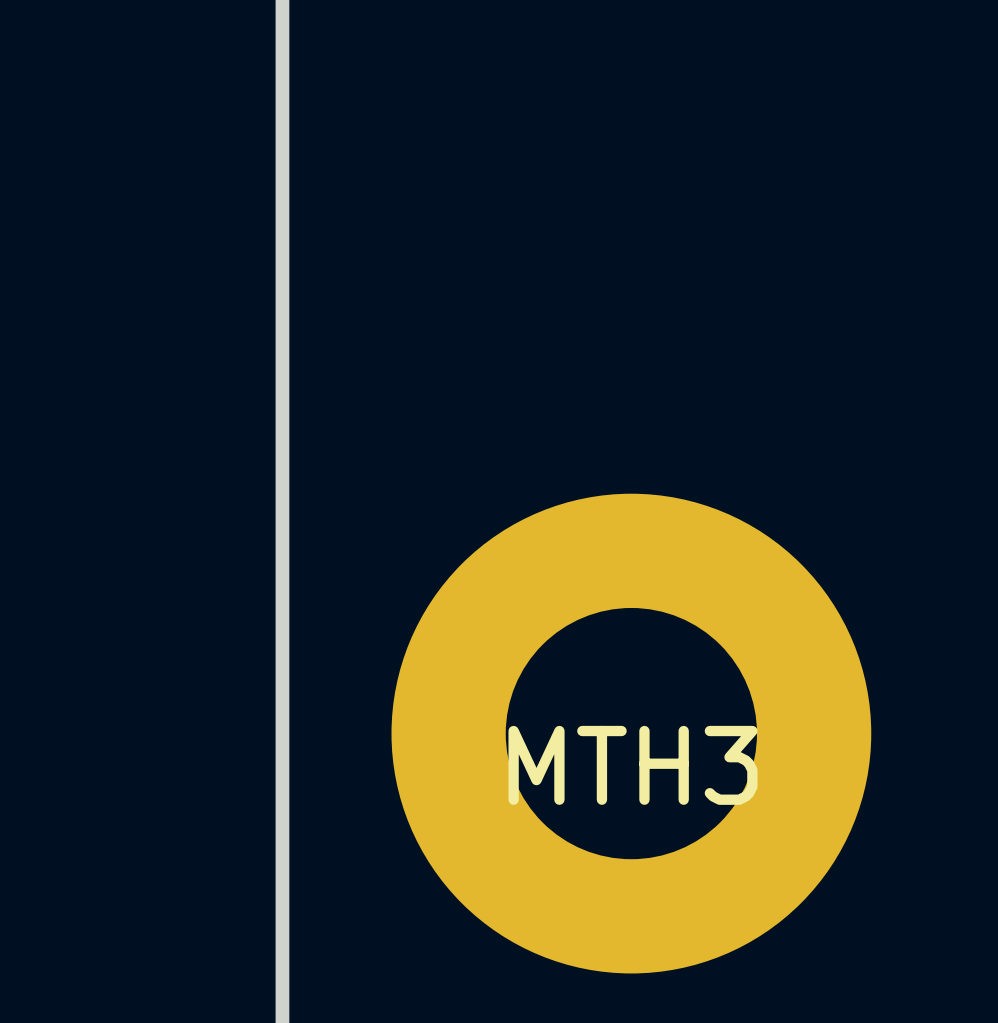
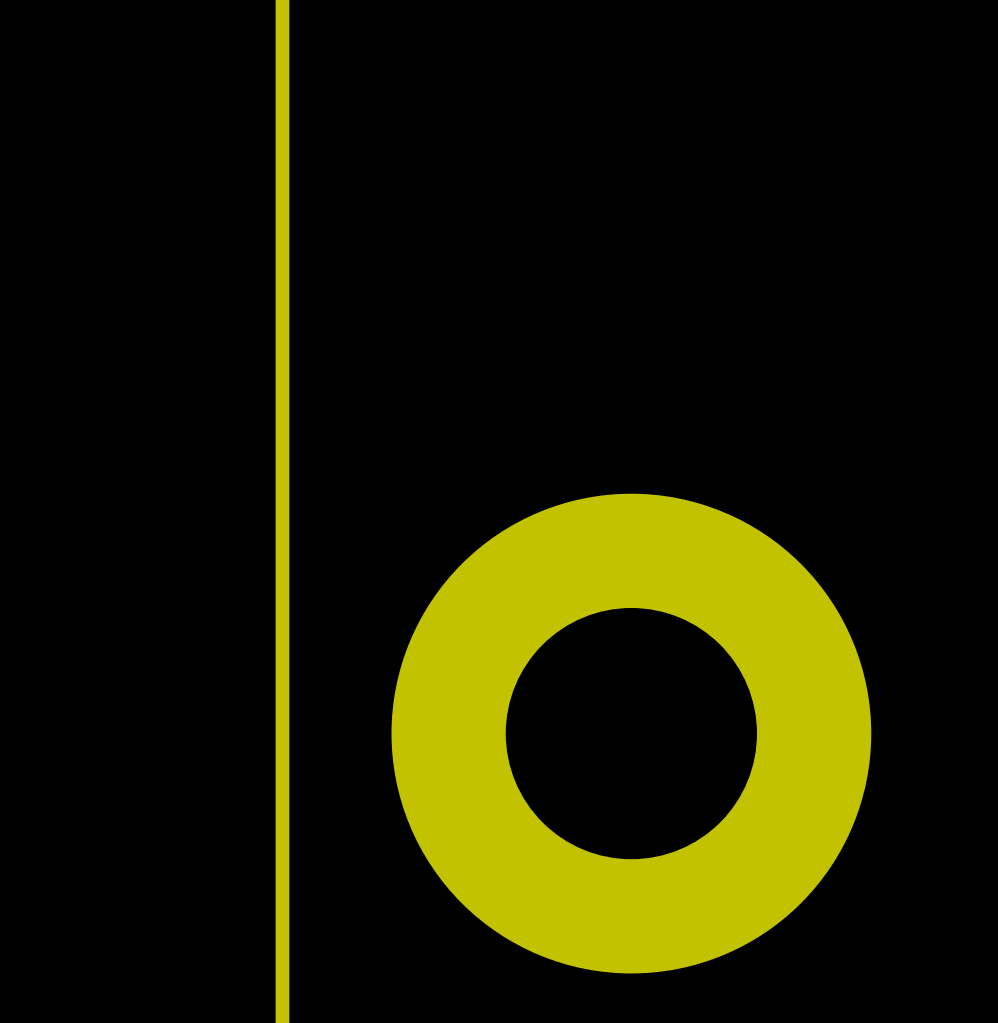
MTH3 name: MTH3 (633, 765) -> none

